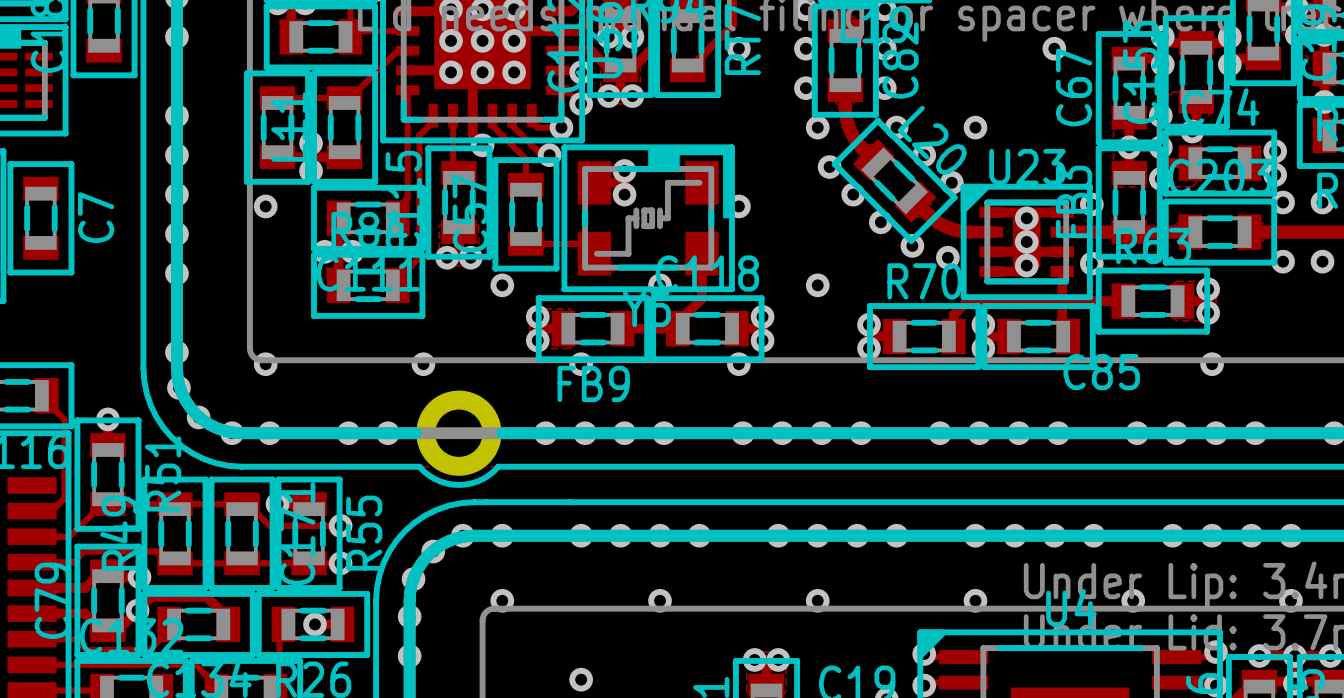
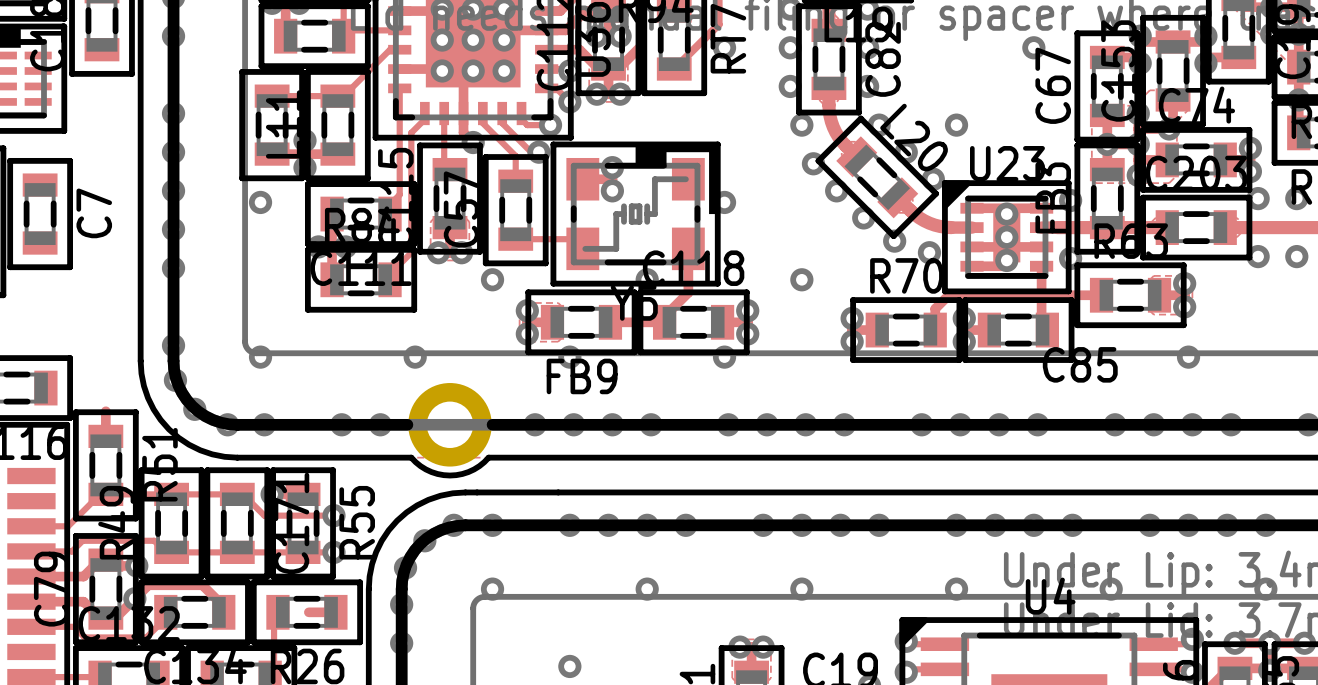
track: (46, 395) (46, 401) (64, 419) (64, 498) (51, 511) (32, 511) -> none
via: (107, 419) -> none
via: (314, 624) -> none
track: (32, 664) (195, 664) (216, 685) (216, 691) -> none

